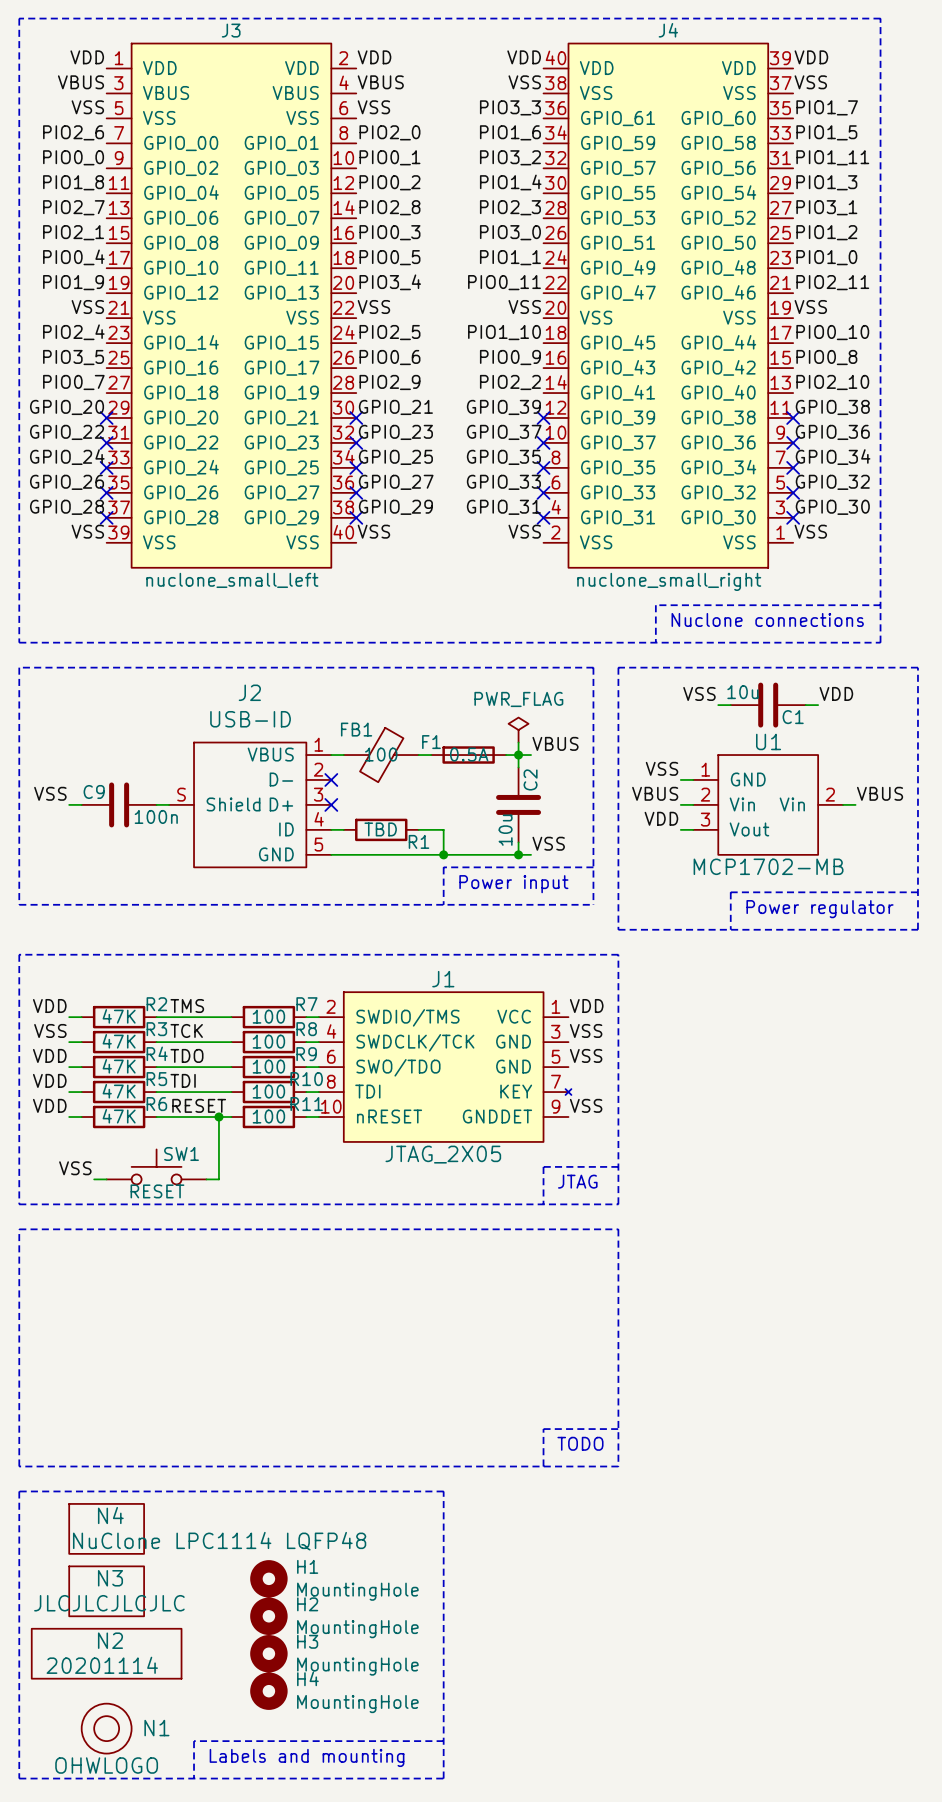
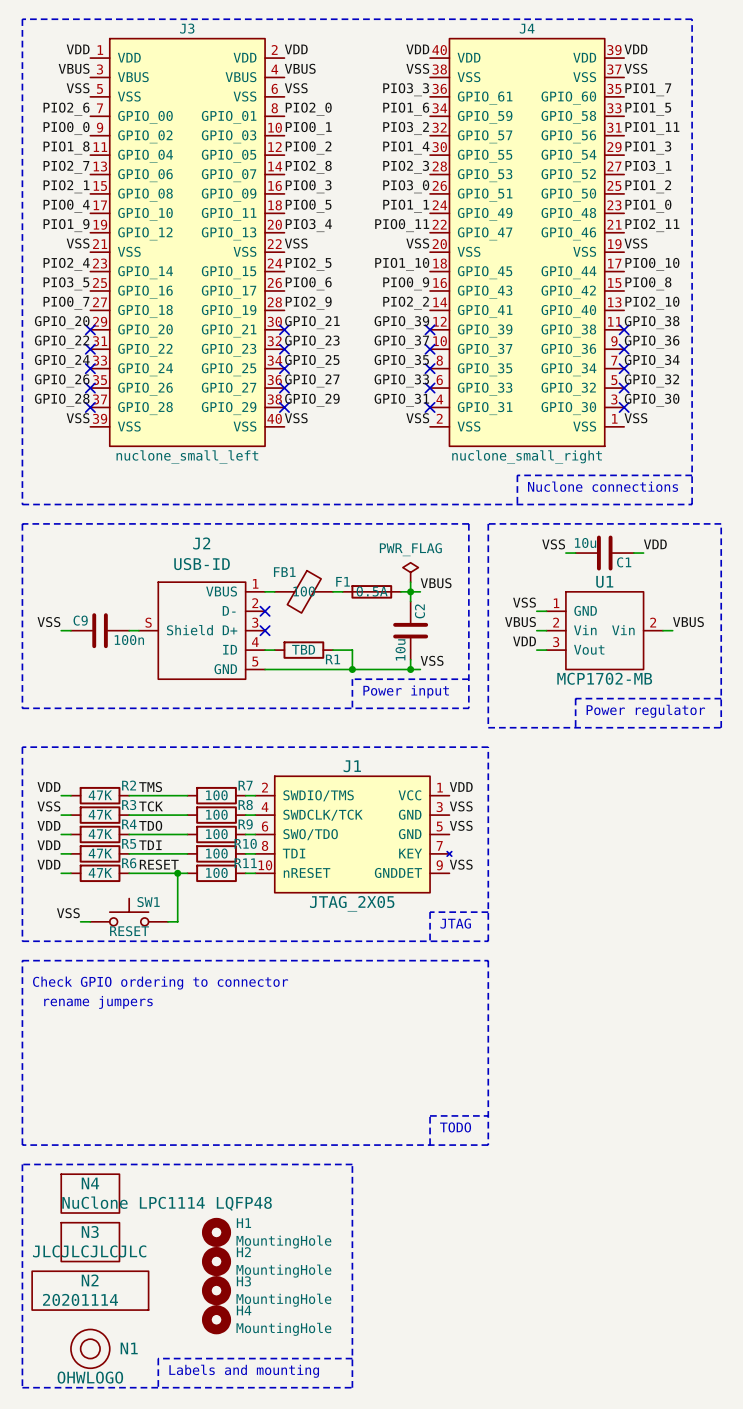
text: none -> Check GPIO ordering to connector (160, 983)
text: none -> rename jumpers (98, 1002)

